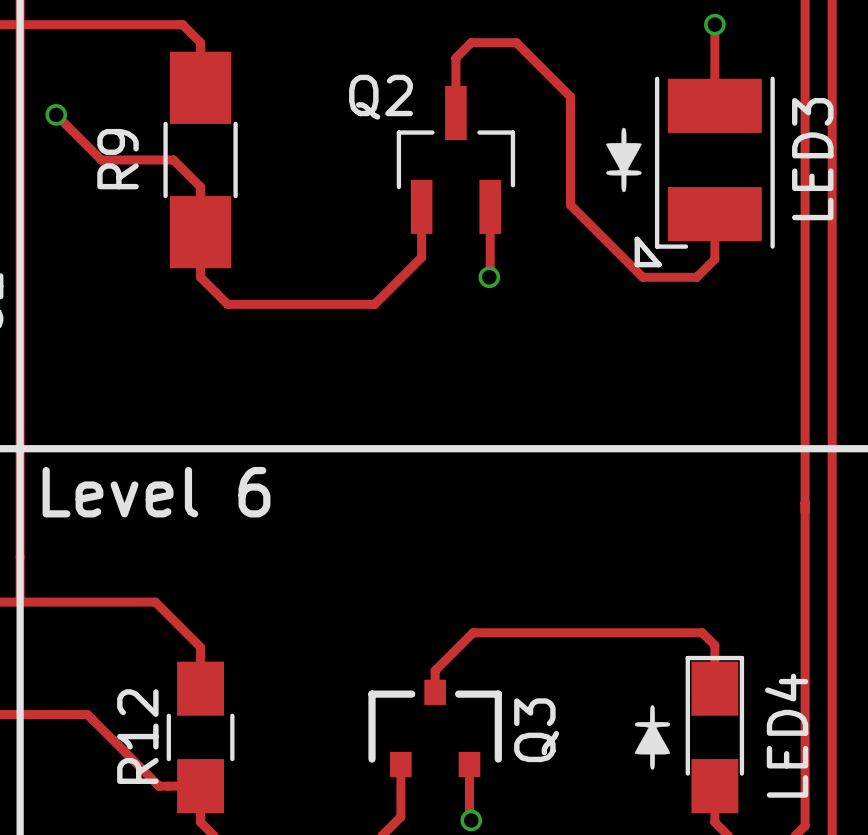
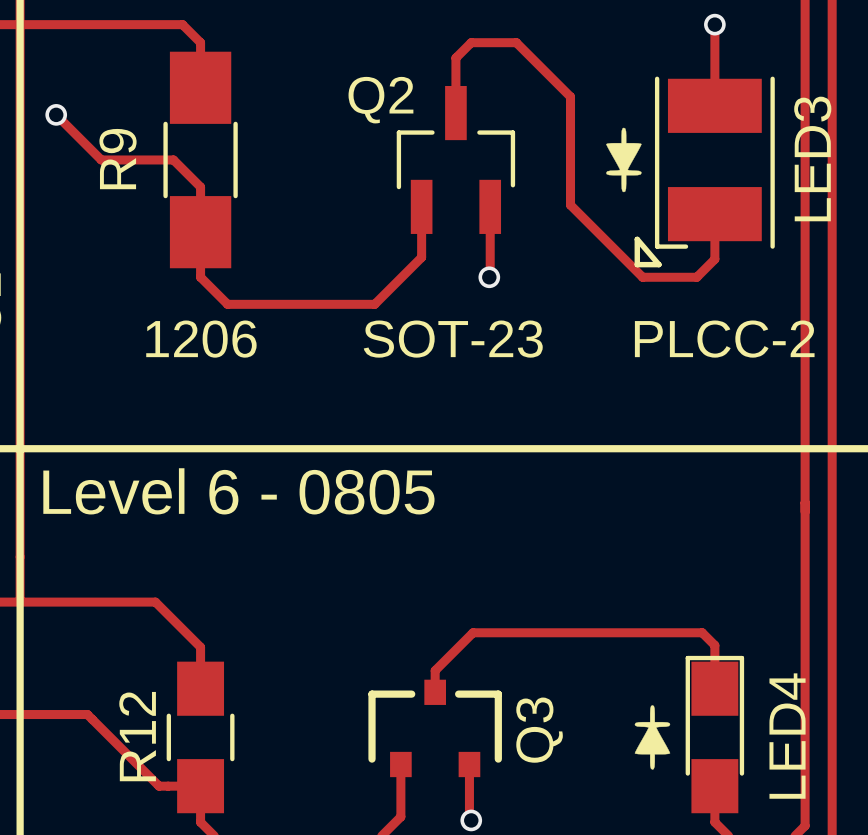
text: none -> 1206 (201, 339)
text: none -> SOT-23 (453, 339)
text: none -> PLCC-2 (724, 339)
text: Level 6 (156, 492) -> Level 6 - 0805 (238, 491)

